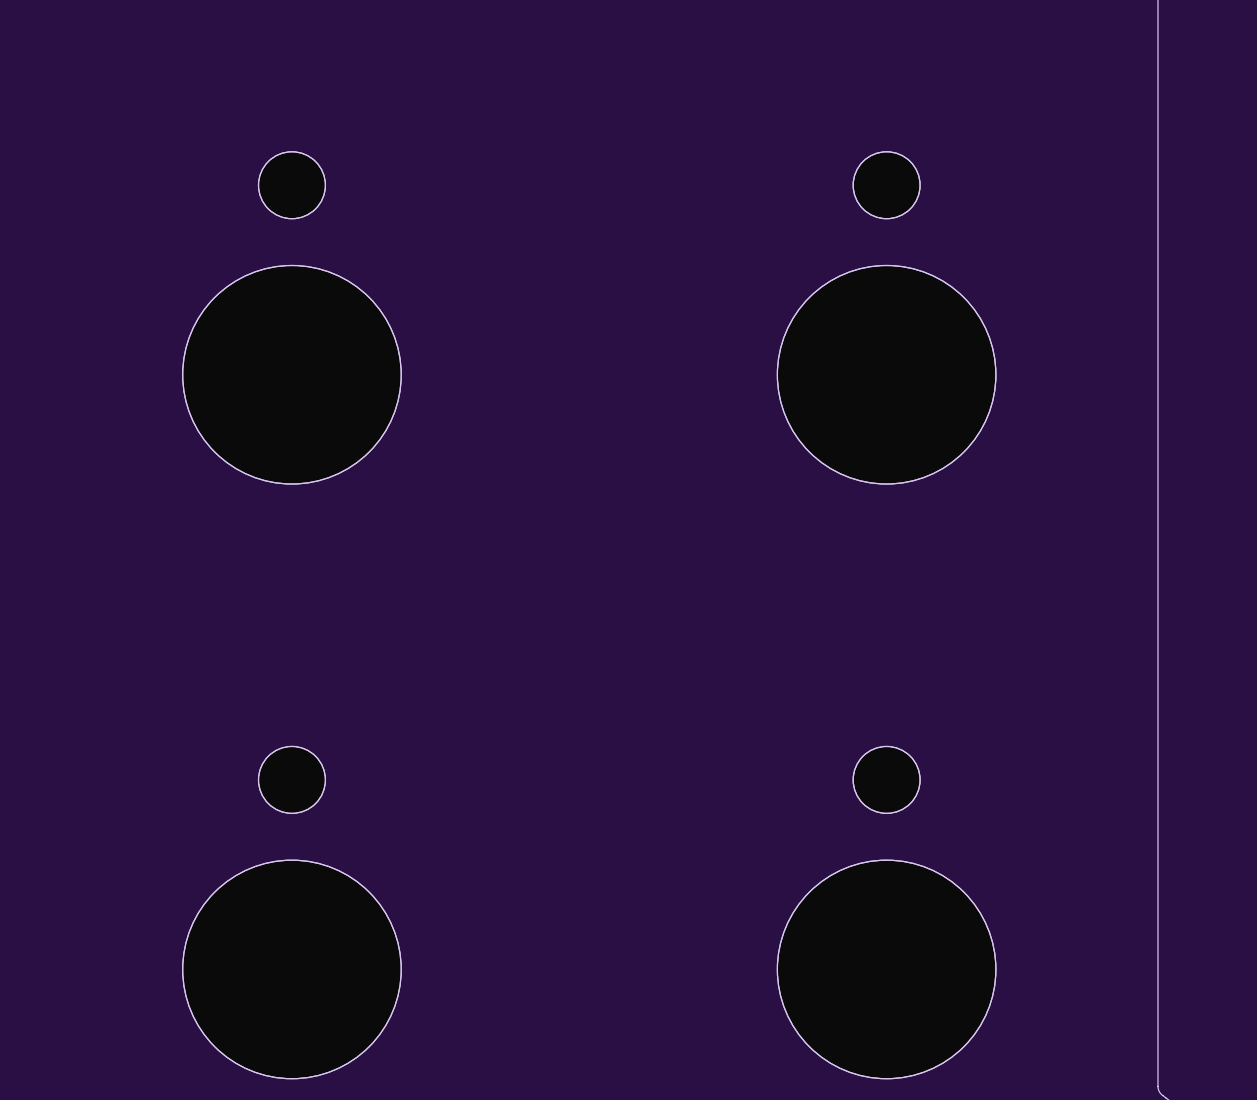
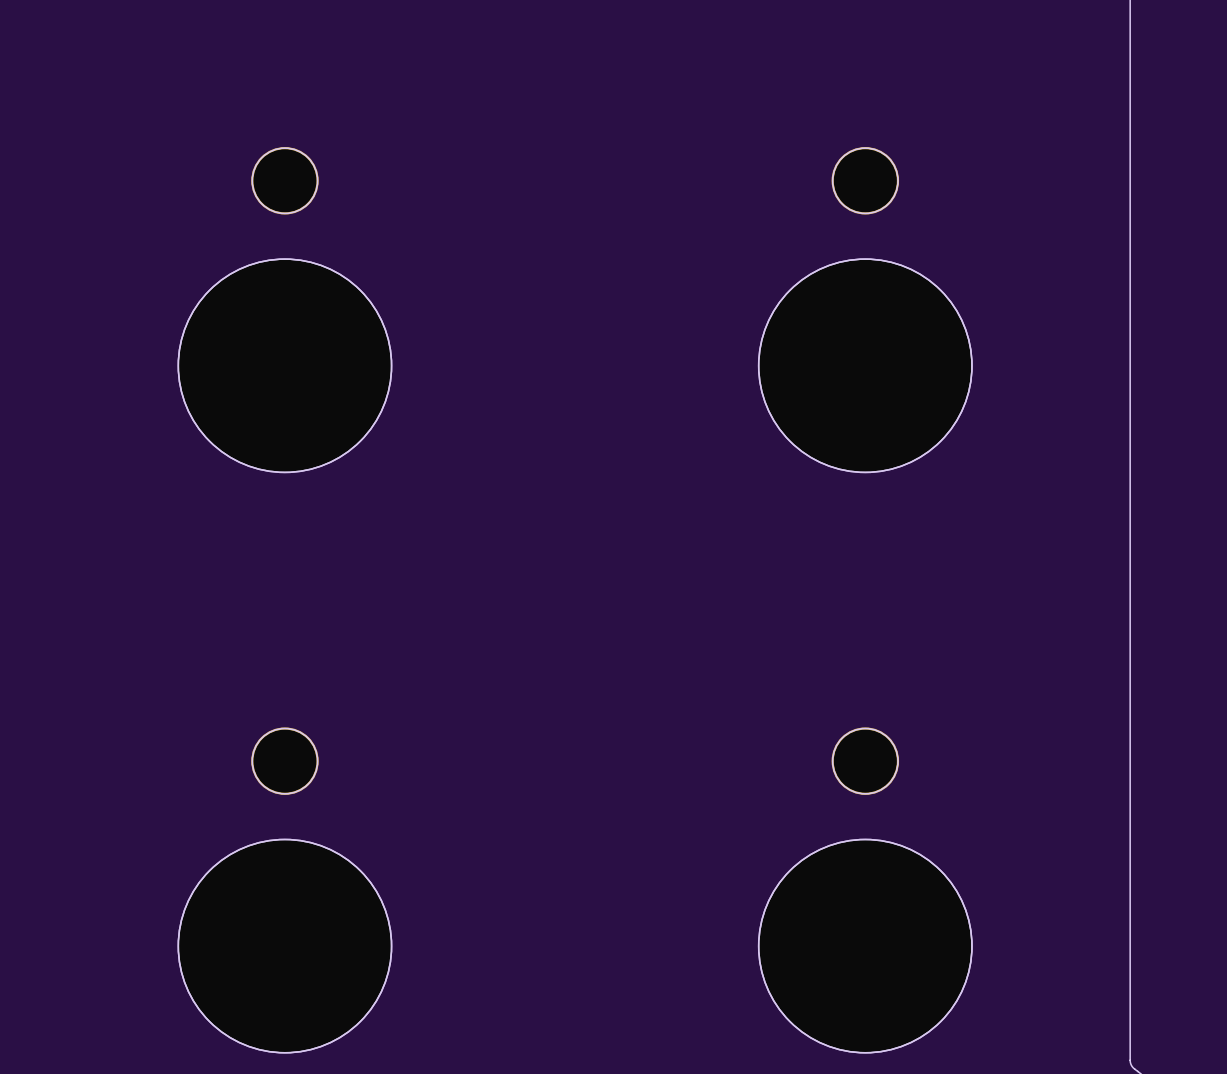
part footprint: [258, 151, 326, 219] -> [251, 147, 319, 215]
part footprint: [853, 151, 921, 219] -> [831, 147, 900, 215]
part footprint: [258, 746, 326, 814] -> [251, 727, 319, 795]
part footprint: [853, 746, 921, 814] -> [831, 727, 900, 795]

